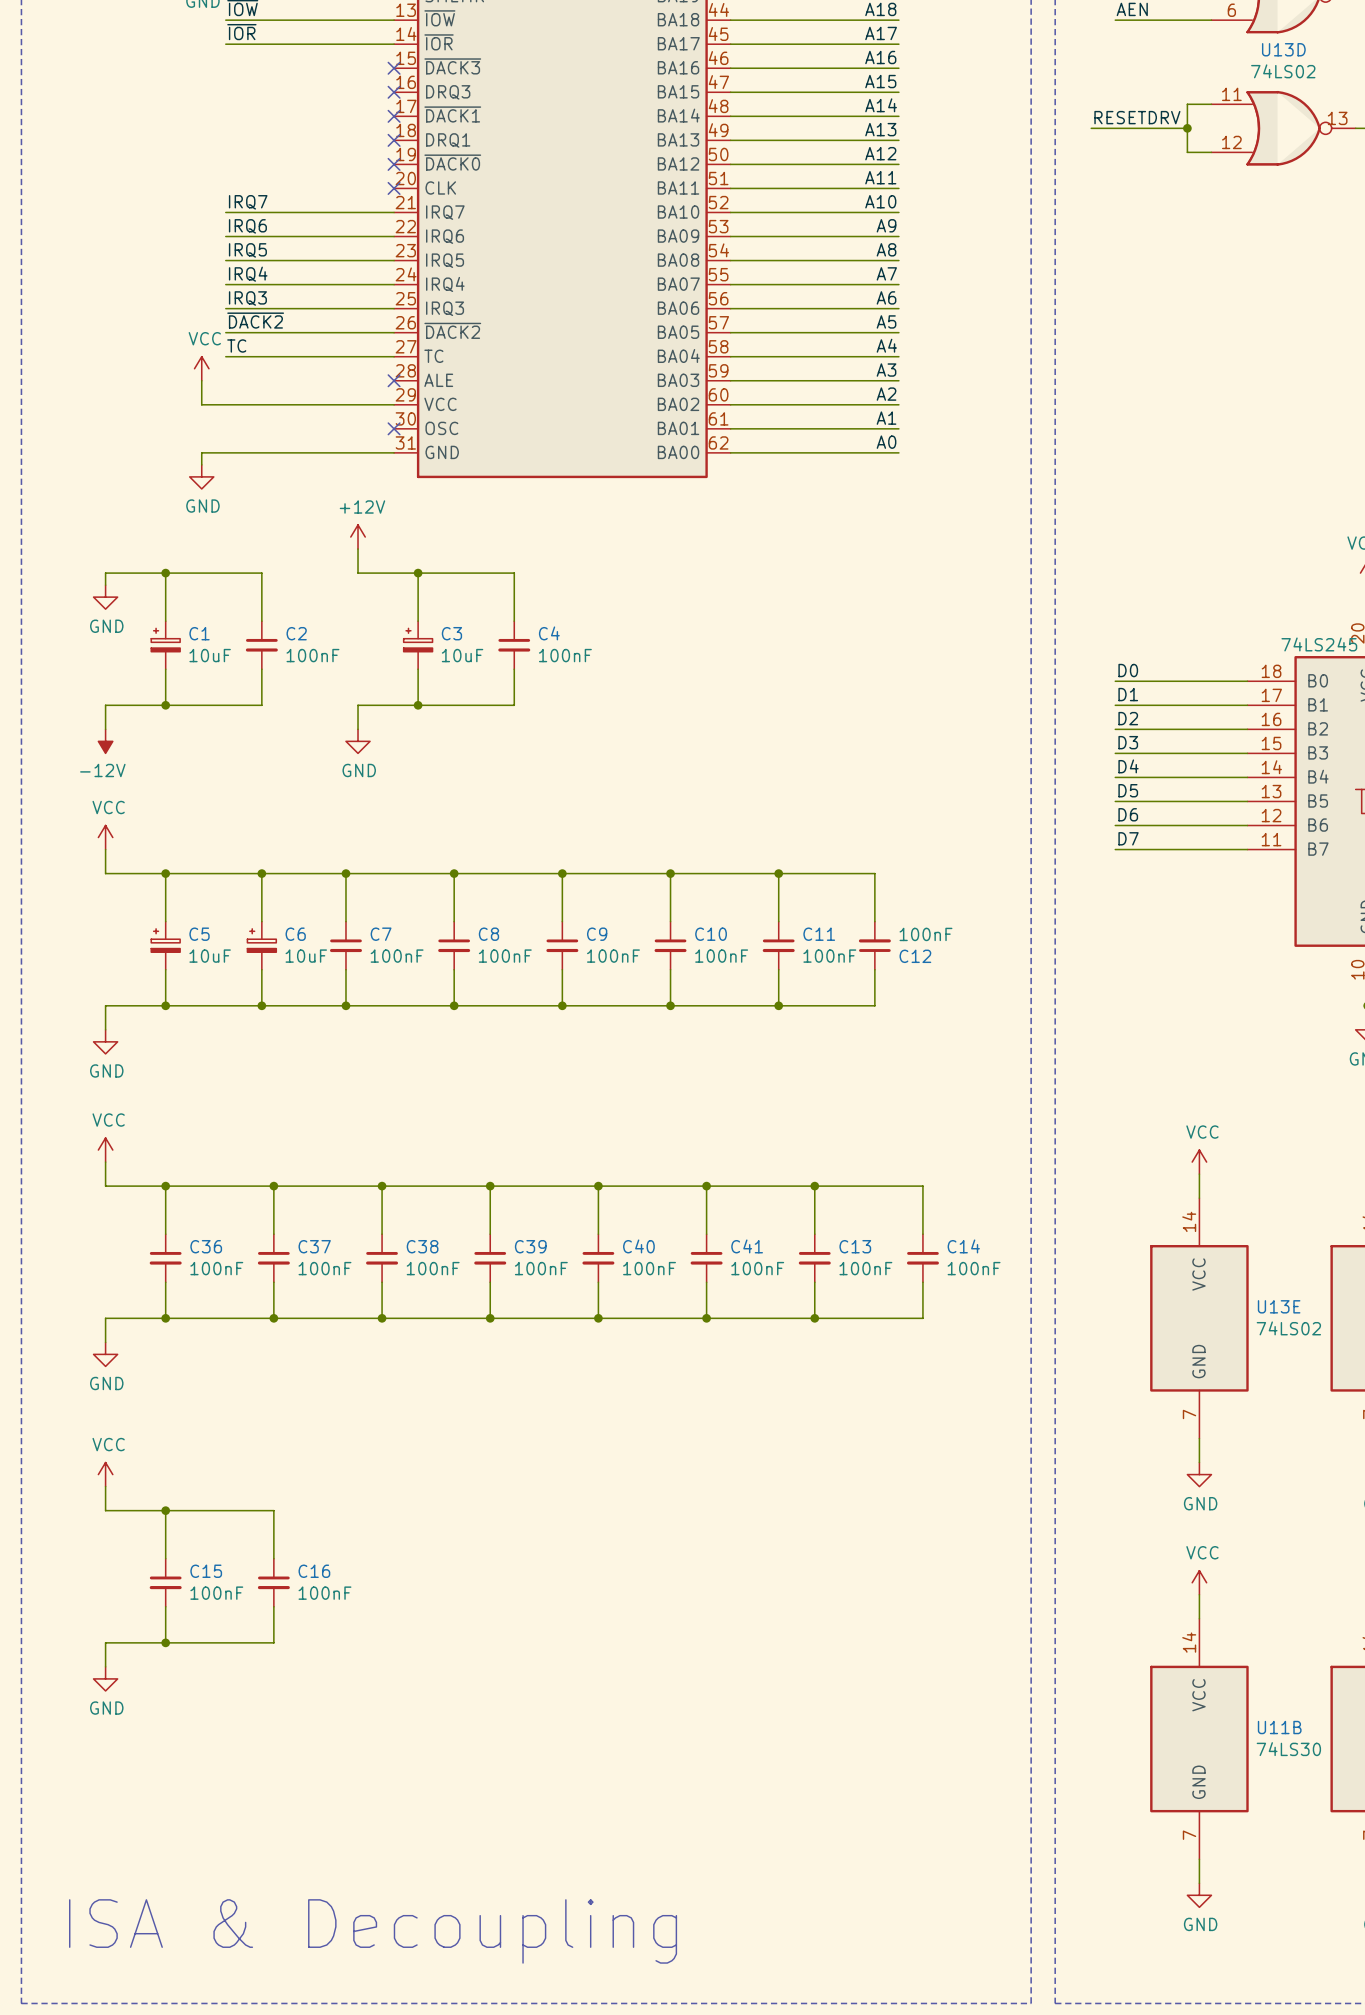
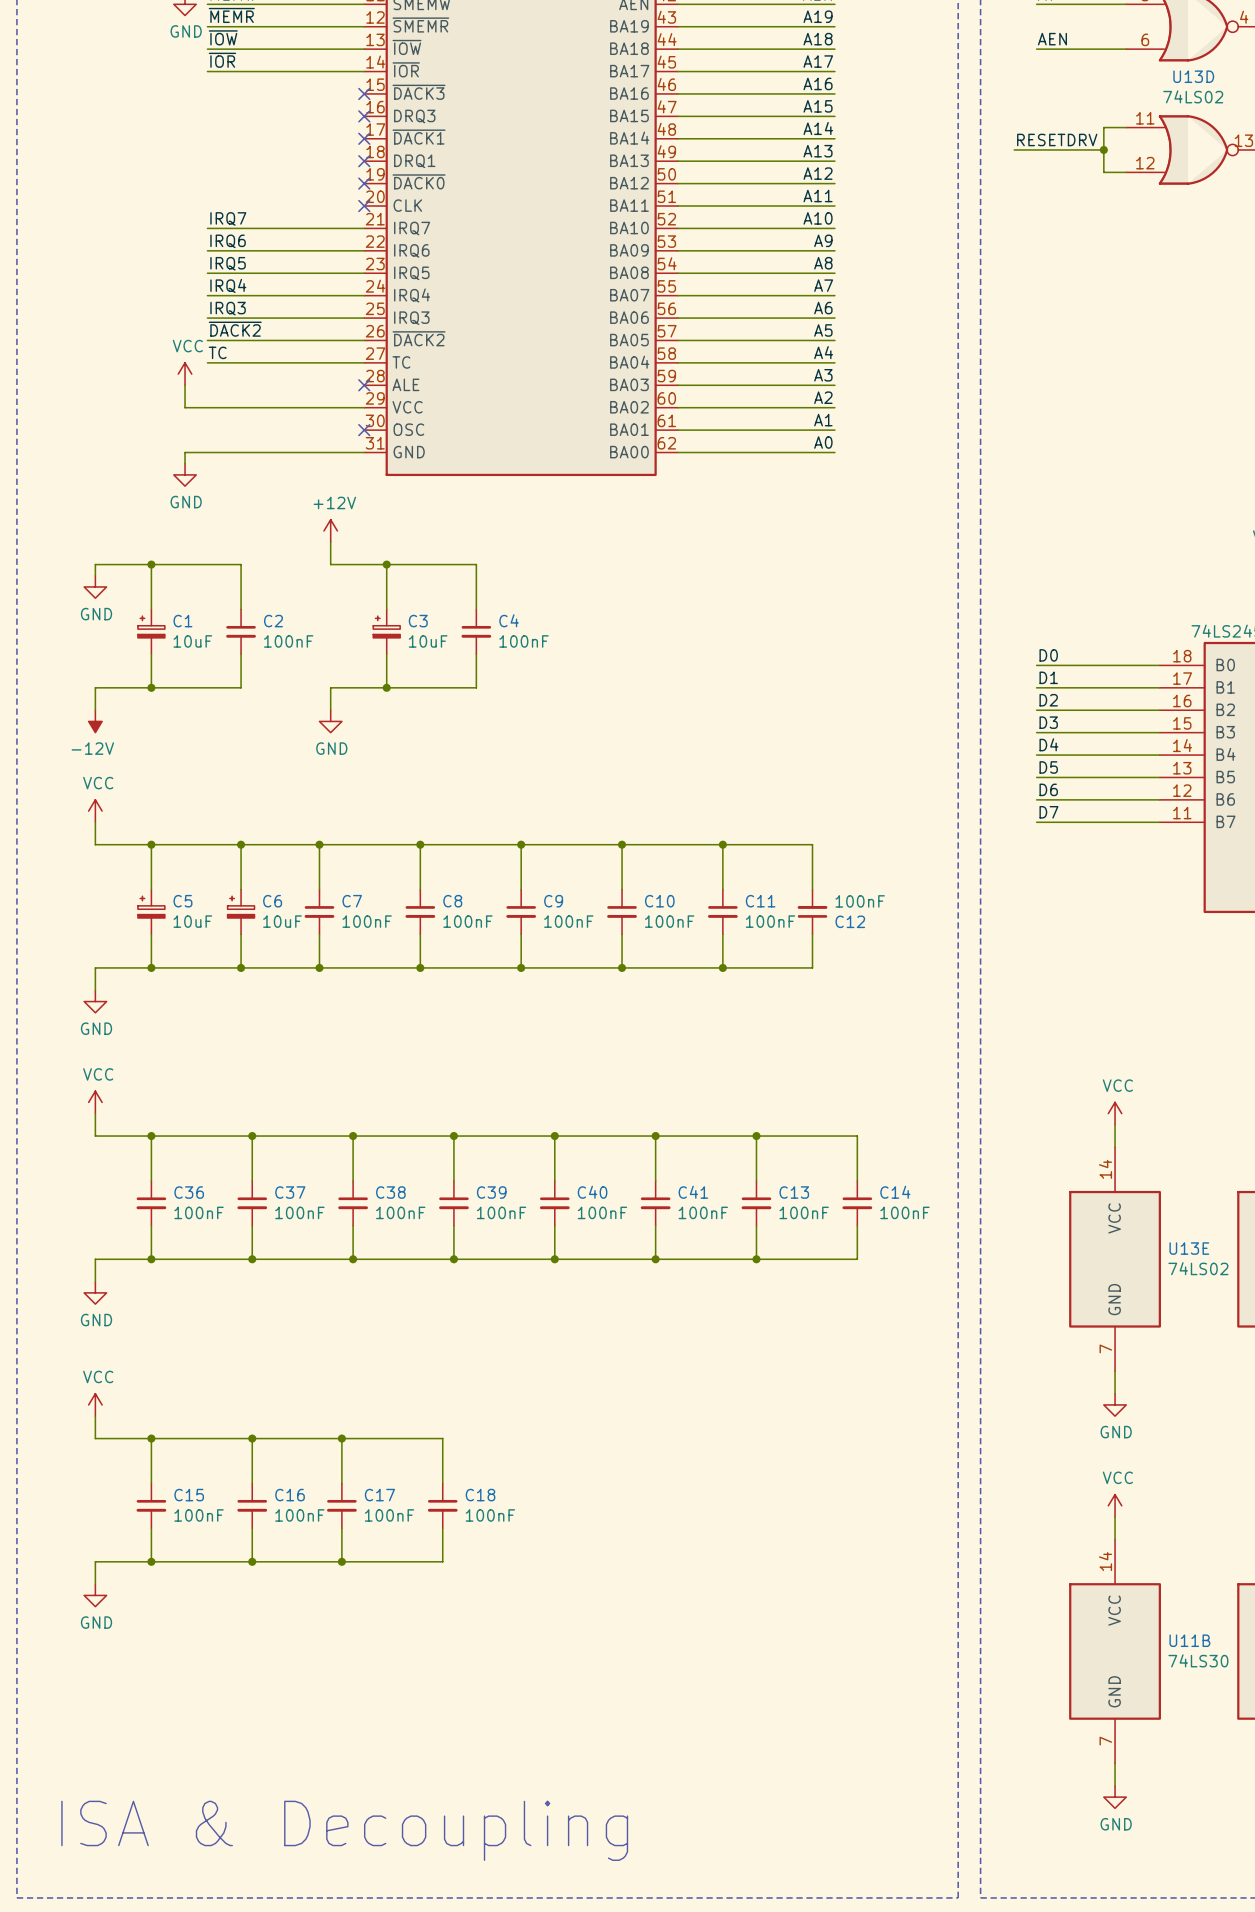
wire: none -> (252, 1438) (442, 1438) (442, 1483)
junction: none -> (252, 1438)
wire: none -> (341, 1438) (341, 1483)
junction: none -> (341, 1438)
C17: none -> 100nF (341, 1505)
C18: none -> 100nF (442, 1505)
wire: none -> (341, 1528) (341, 1561)
wire: none -> (442, 1528) (442, 1561) (252, 1561)
junction: none -> (252, 1561)
junction: none -> (341, 1561)

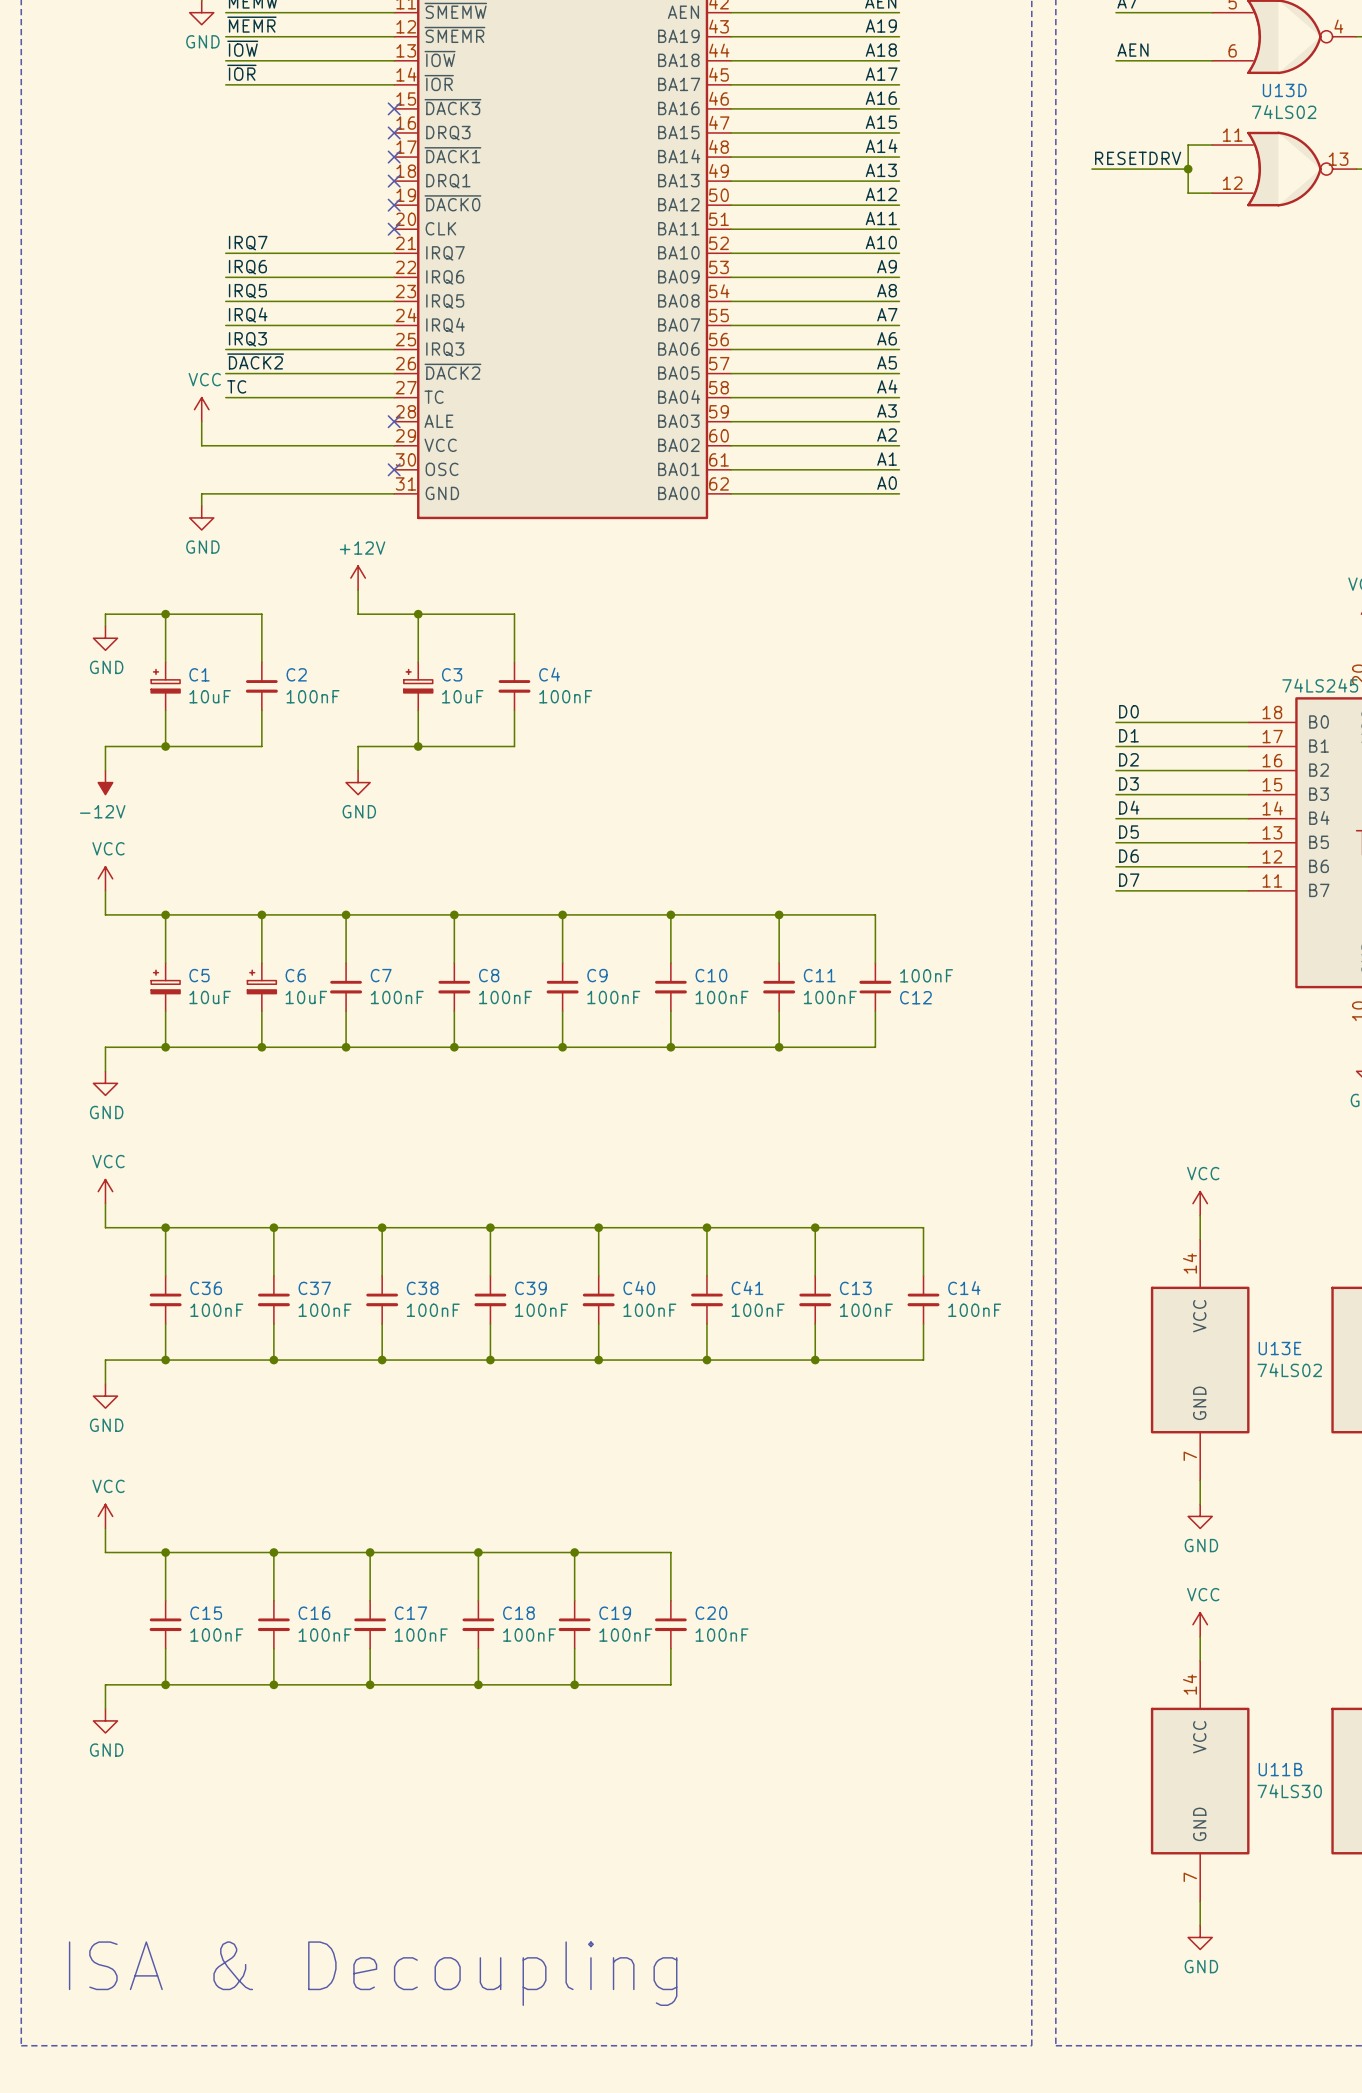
wire: none -> (478, 1552) (670, 1552) (670, 1600)
junction: none -> (478, 1552)
wire: none -> (574, 1552) (574, 1600)
junction: none -> (574, 1552)
C19: none -> 100nF (574, 1624)
C20: none -> 100nF (670, 1624)
wire: none -> (574, 1648) (574, 1684)
wire: none -> (670, 1648) (670, 1684) (478, 1684)
junction: none -> (478, 1684)
junction: none -> (574, 1684)

